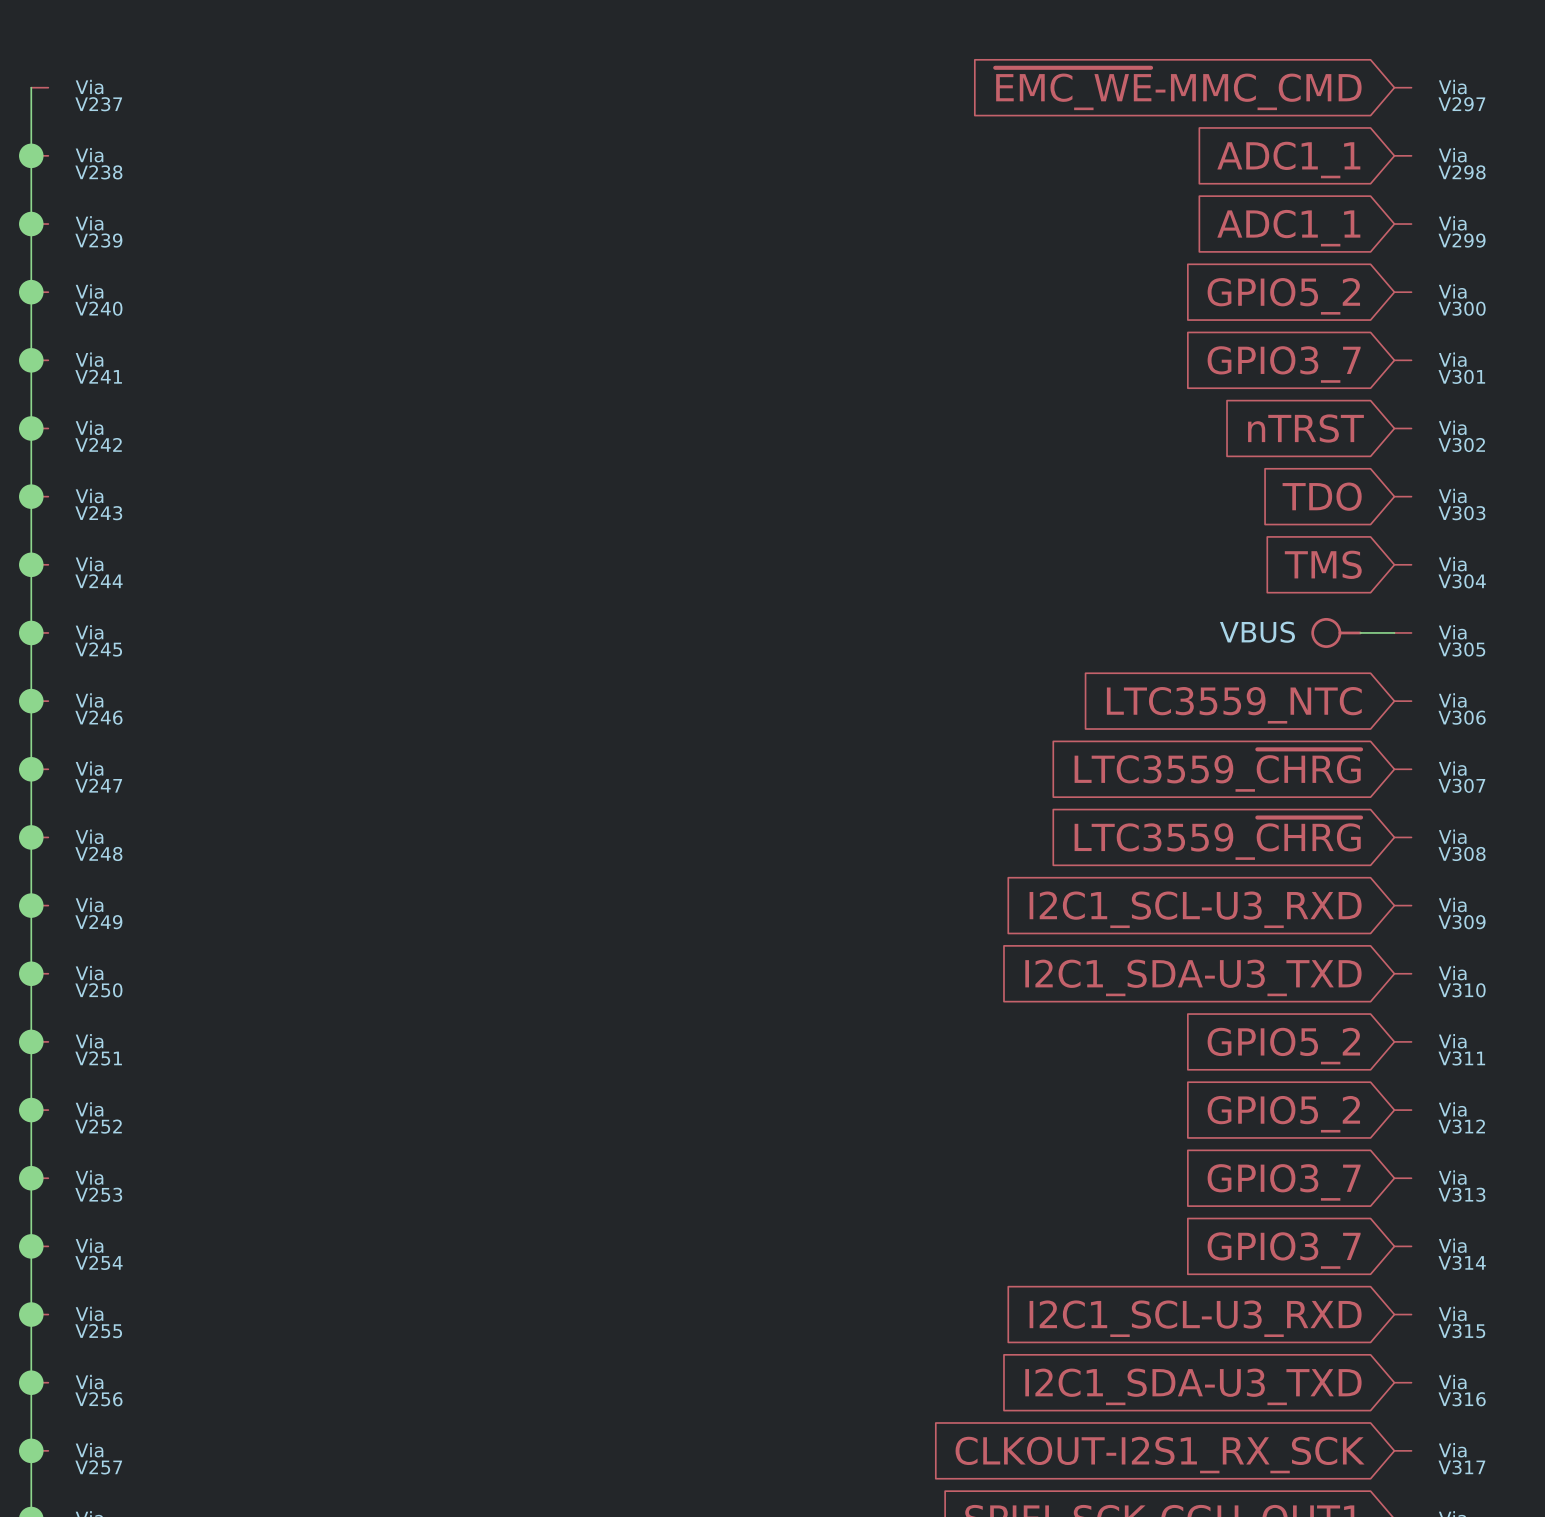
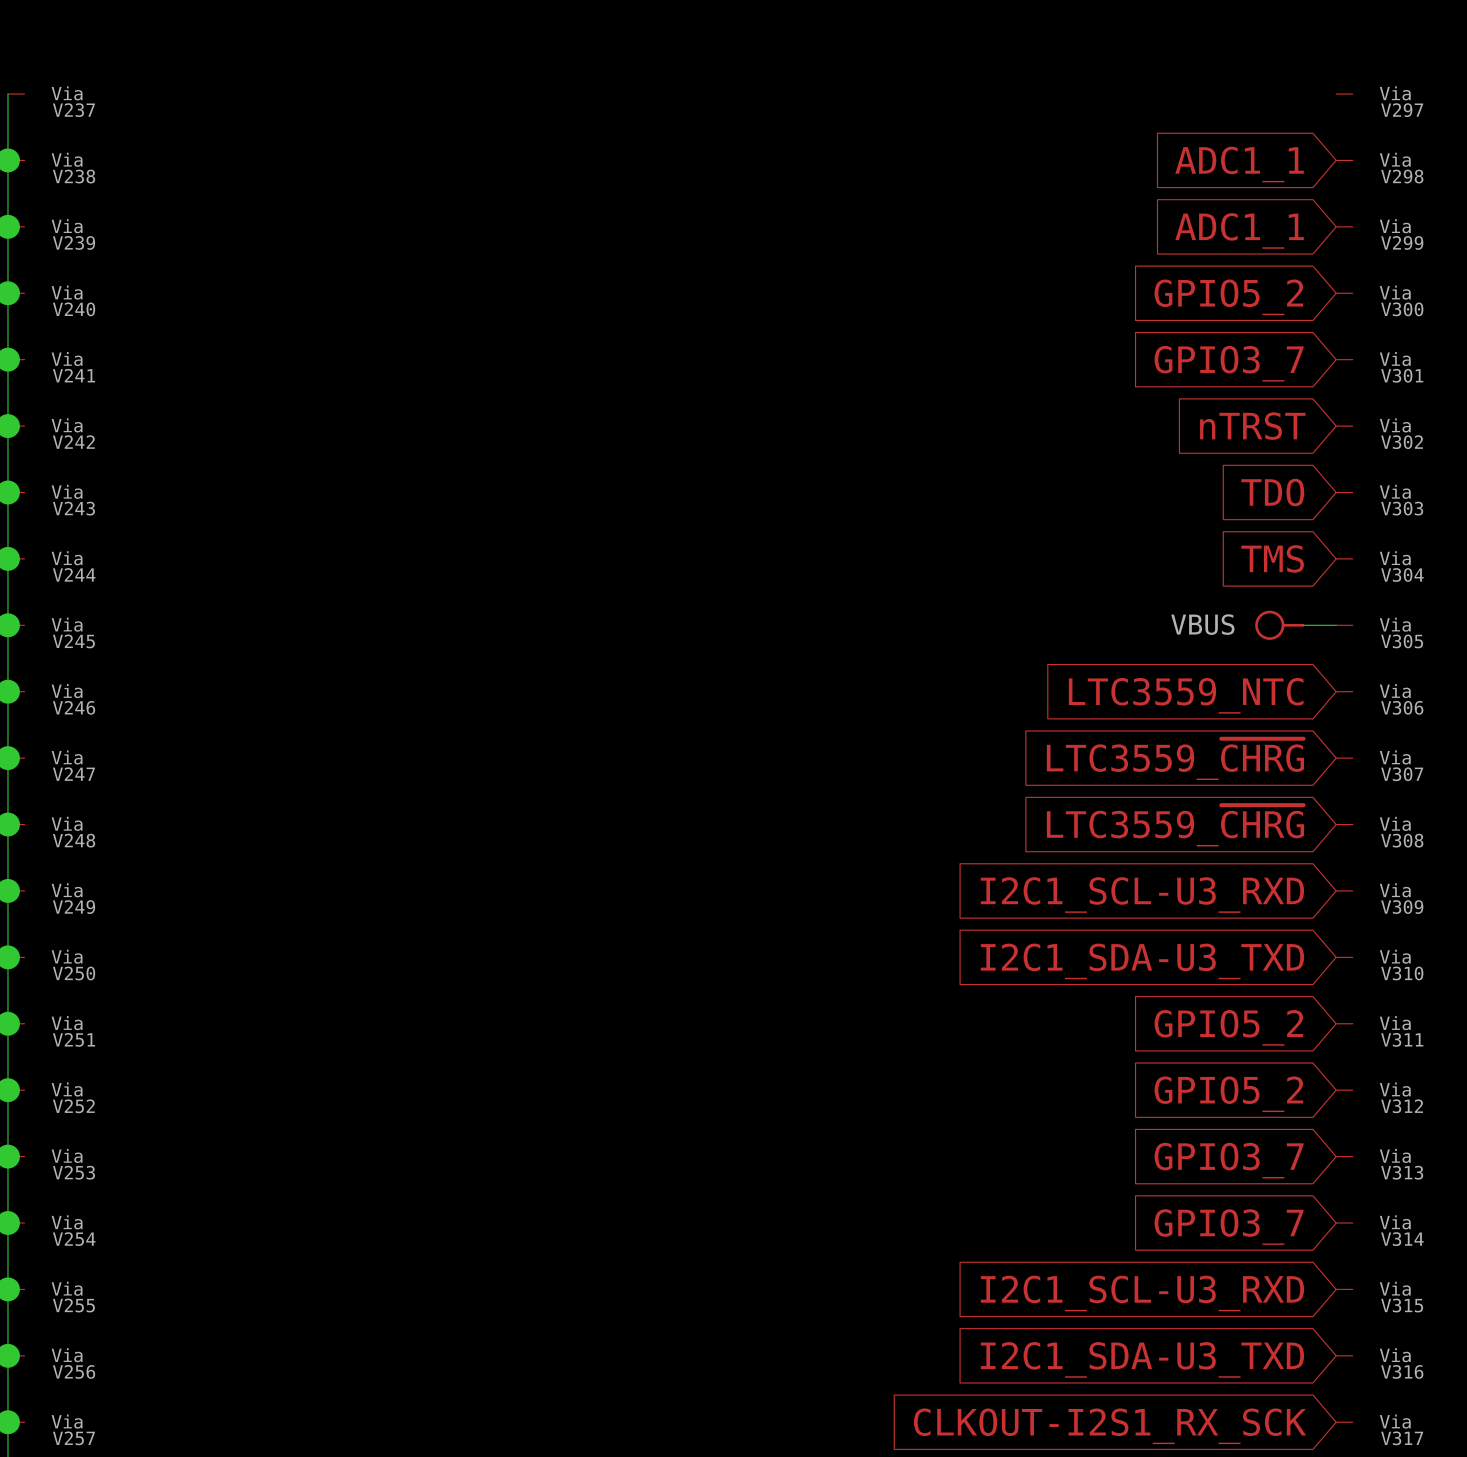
global label: ~{EMC_WE}-MMC_CMD (1178, 88) -> none

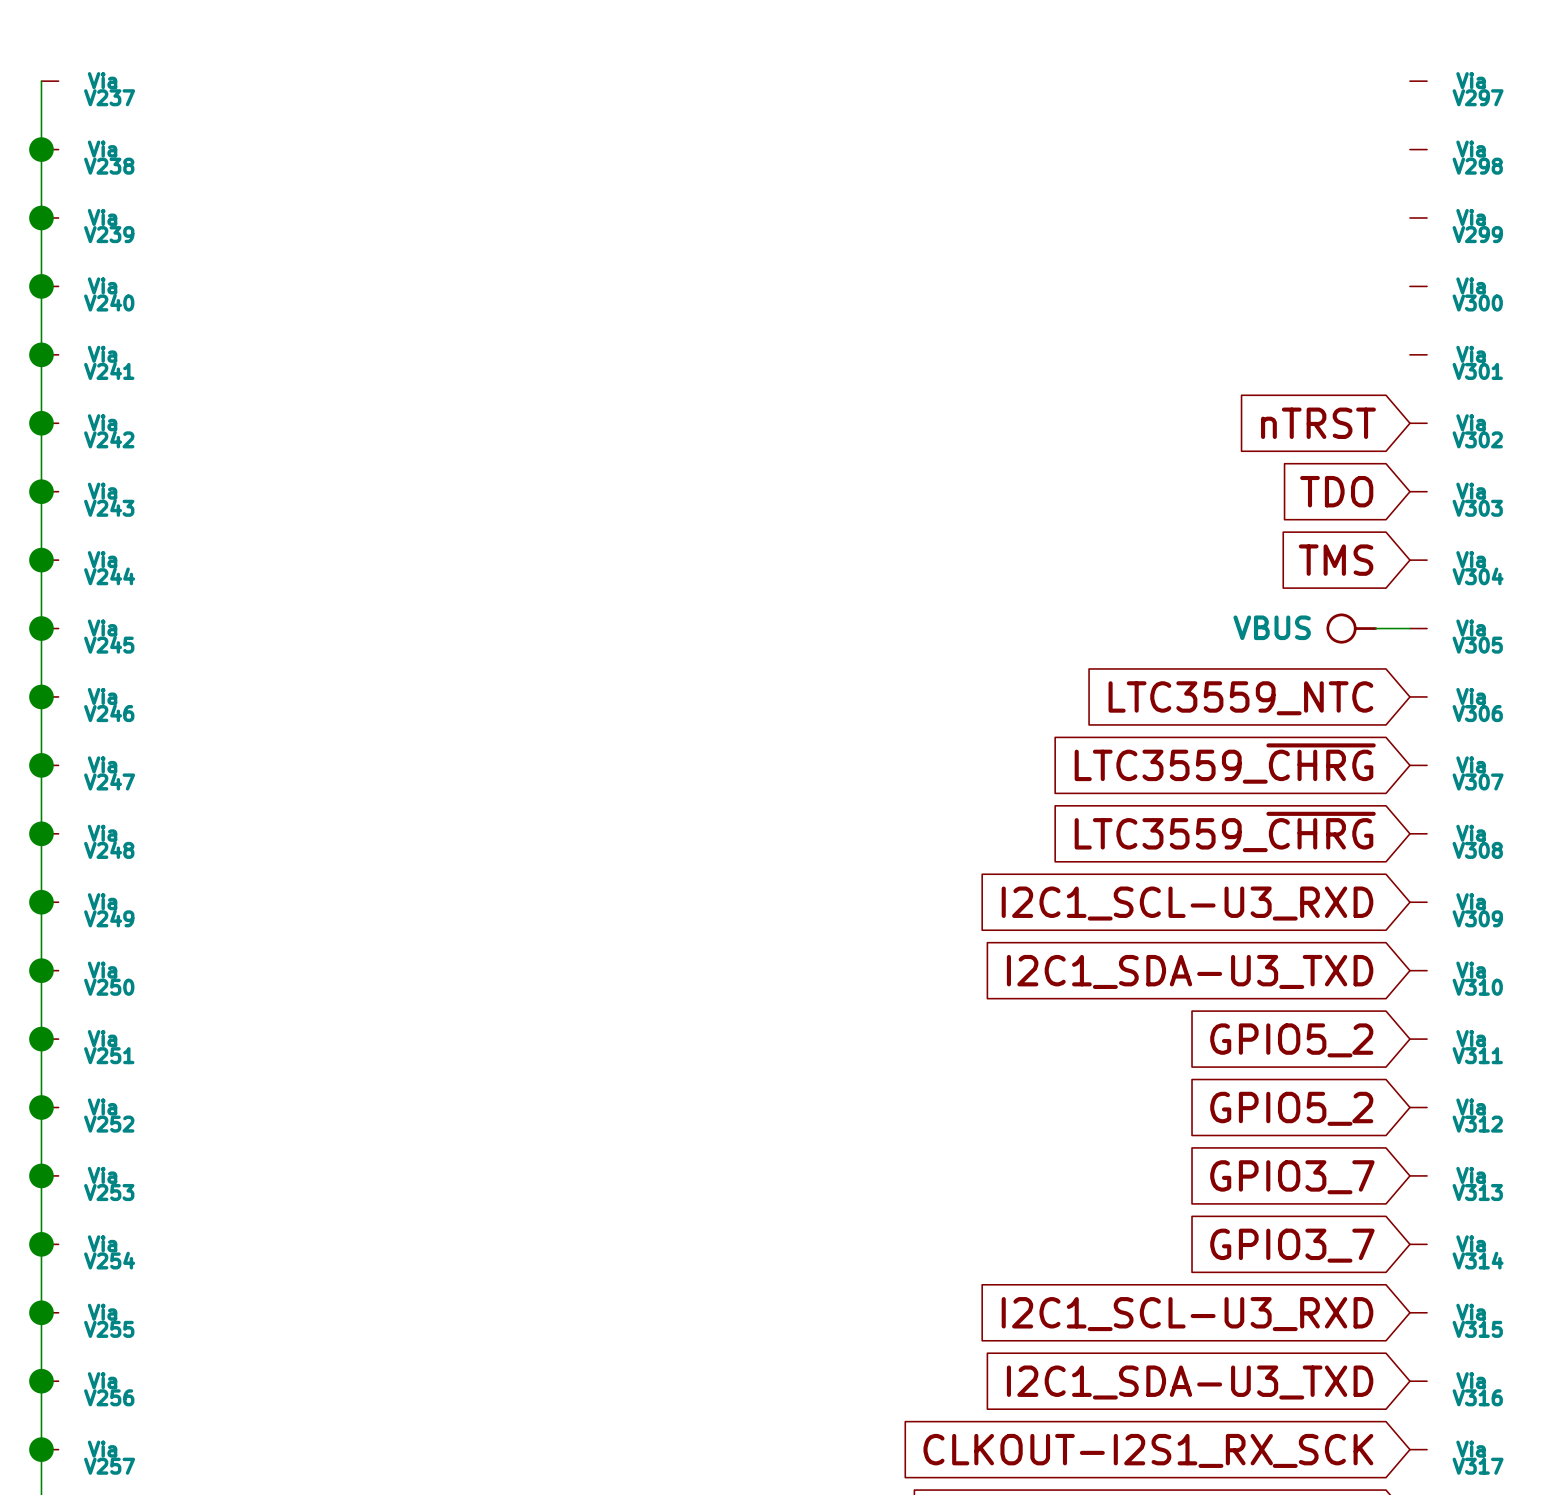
global label: ADC1_1 (1239, 164) -> none
global label: ADC1_1 (1239, 230) -> none
global label: GPIO5_2 (1228, 297) -> none
global label: GPIO3_7 (1229, 363) -> none

